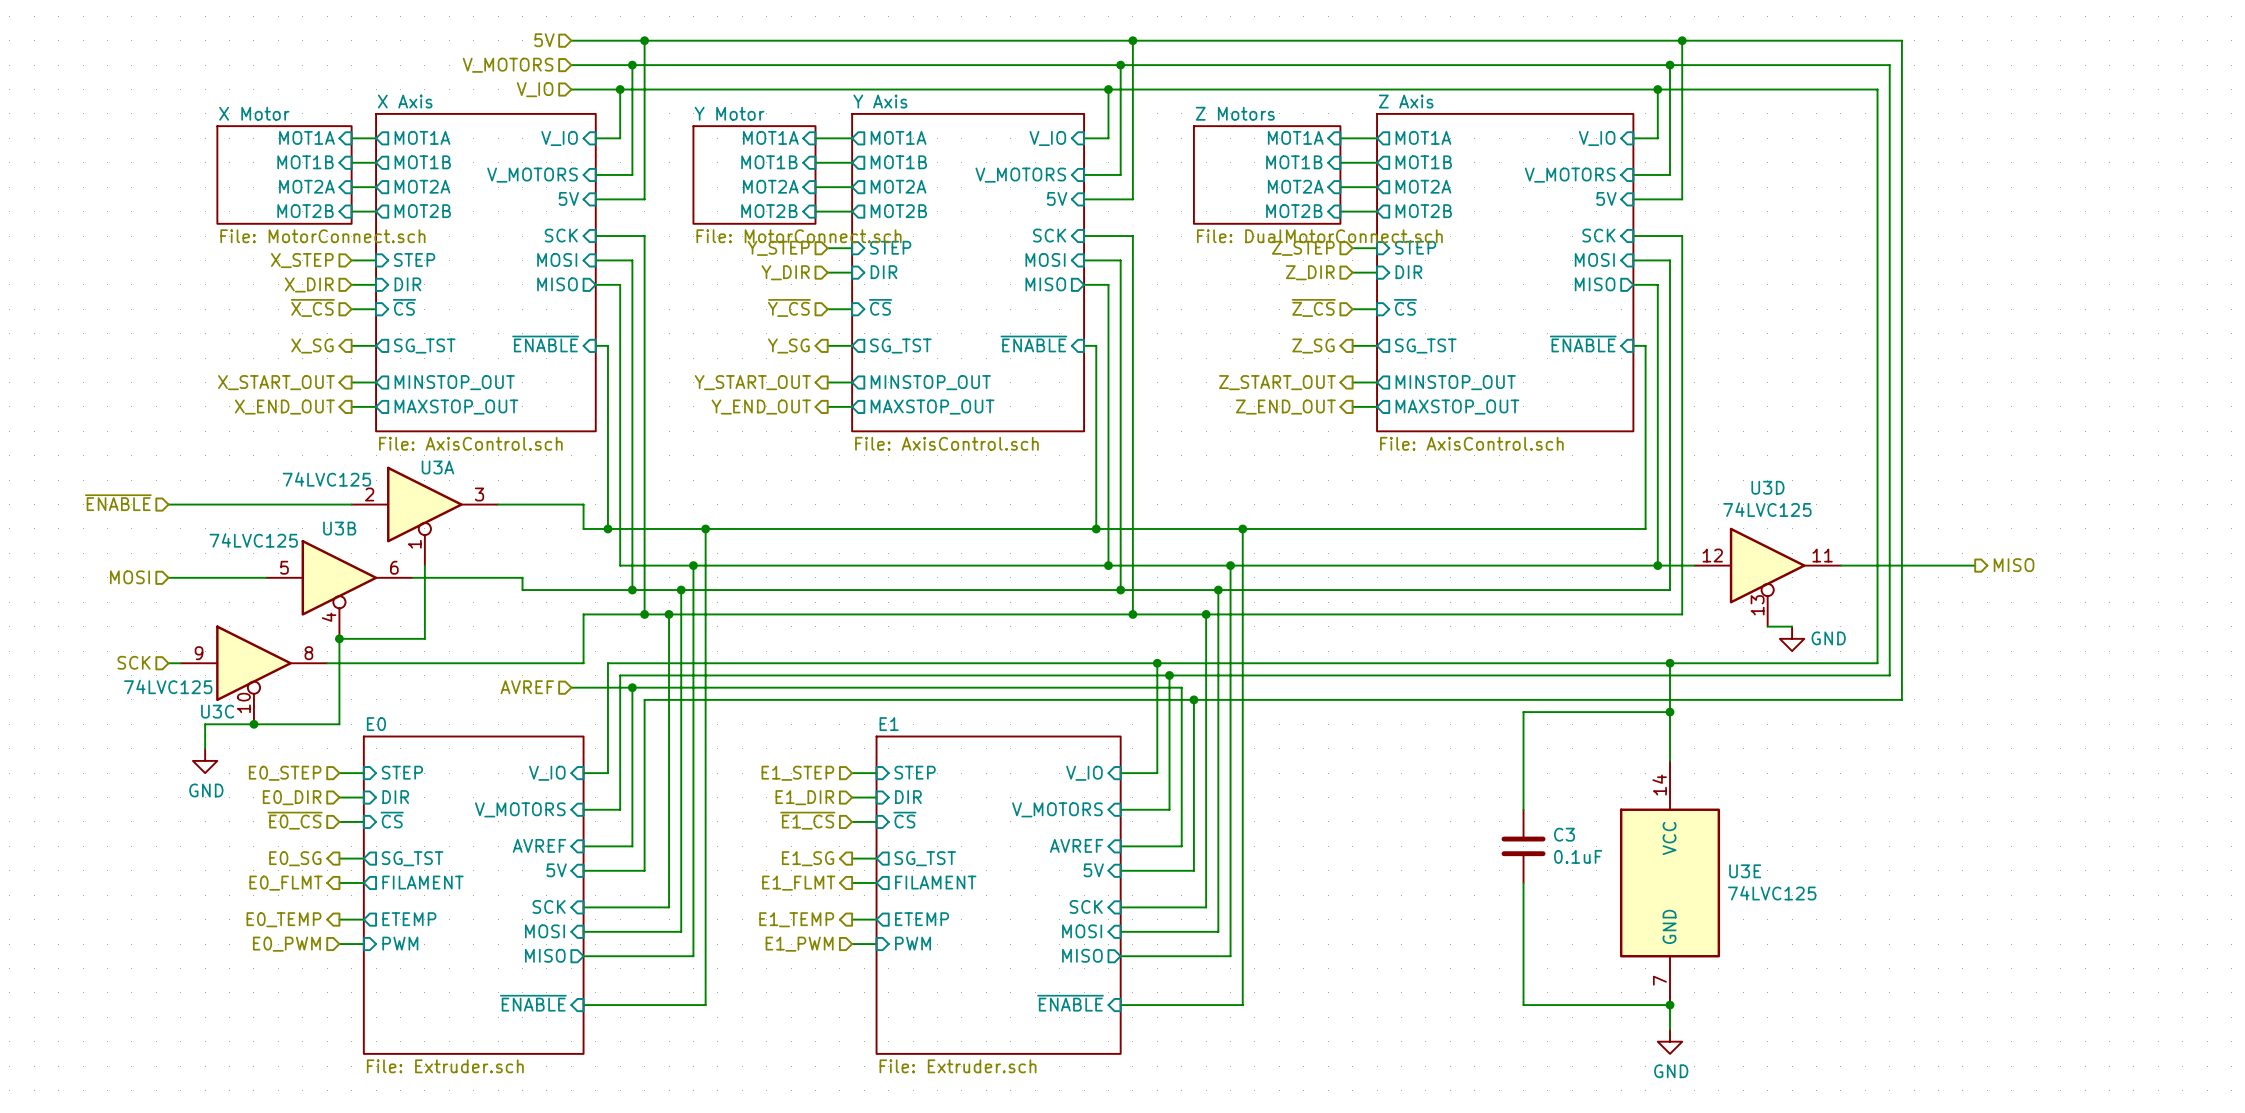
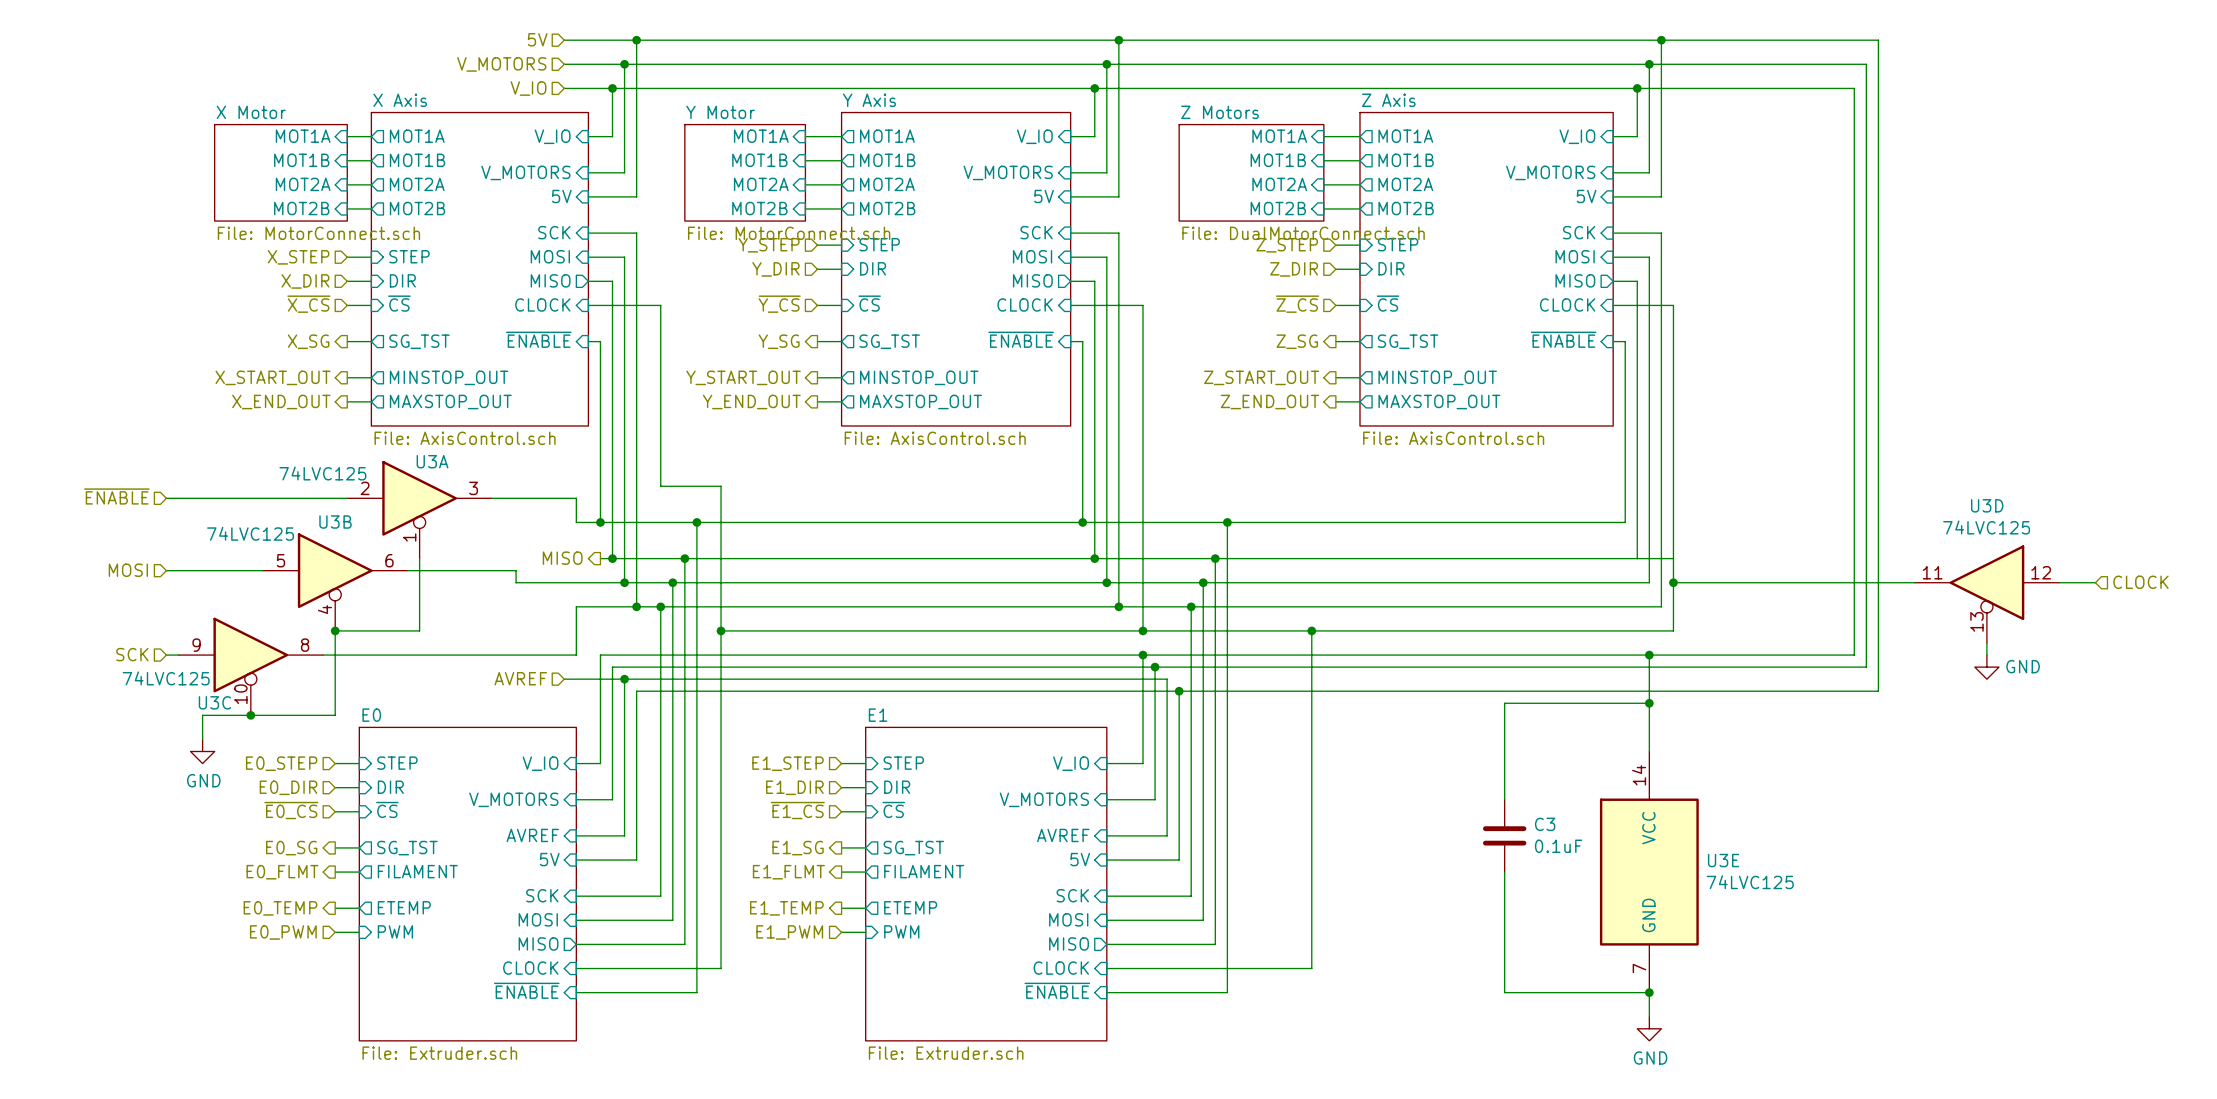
sheet pin: none -> CLOCK (542, 304)
sheet pin: none -> CLOCK (1025, 304)
sheet pin: none -> CLOCK (1567, 304)
wire: none -> (588, 305) (660, 305) (660, 486) (721, 486) (721, 968) (576, 968)
wire: none -> (1070, 305) (1142, 305) (1142, 630)
wire: none -> (1613, 305) (1673, 305) (1673, 630) (721, 630)
hierarchical label: none -> MISO (562, 558)
wire: none -> (600, 558) (612, 558)
junction: none -> (612, 558)
junction position: (1657, 565) -> (1673, 582)
U3D flip: as is (1767, 565) -> left-right (1986, 582)
wire: (1840, 565) (1975, 565) -> none
hierarchical label: MISO (2014, 565) -> none
U3D position: (1767, 577) -> (1986, 594)
hierarchical label: none -> CLOCK (2140, 582)
wire: none -> (1673, 582) (1914, 582)
wire: none -> (2059, 582) (2095, 582)
wire: (1767, 626) (1792, 626) -> none
junction: none -> (721, 630)
junction: none -> (1142, 630)
wire: none -> (1311, 630) (1311, 968) (1106, 968)
junction: none -> (1311, 630)
power symbol position: GND (1792, 638) -> GND (1986, 667)
wire: none -> (1986, 643) (1986, 655)
sheet pin: none -> CLOCK (530, 968)
sheet pin: none -> CLOCK (1061, 968)

